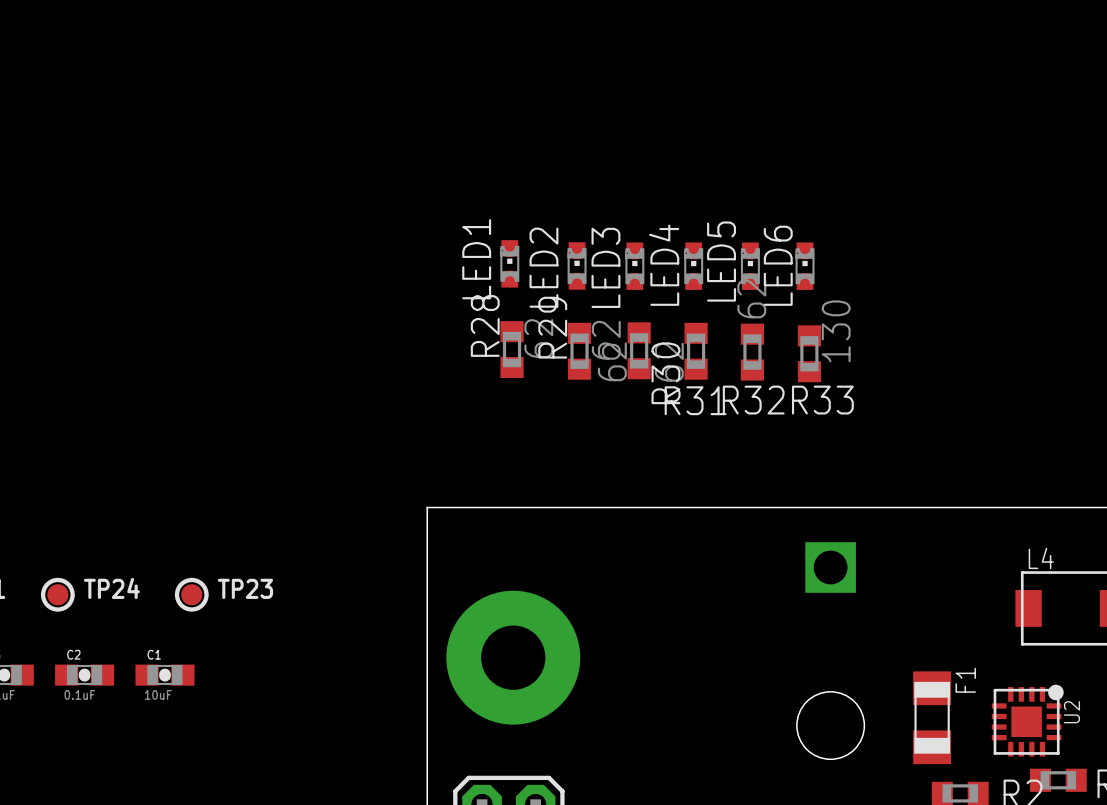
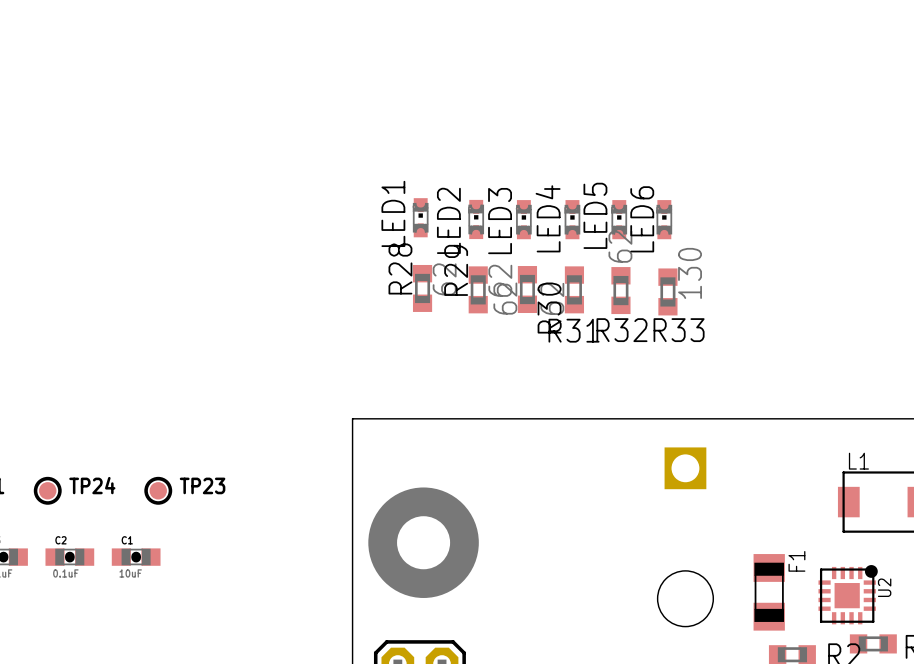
L4 name: L4 (1041, 558) -> L1 (858, 461)

